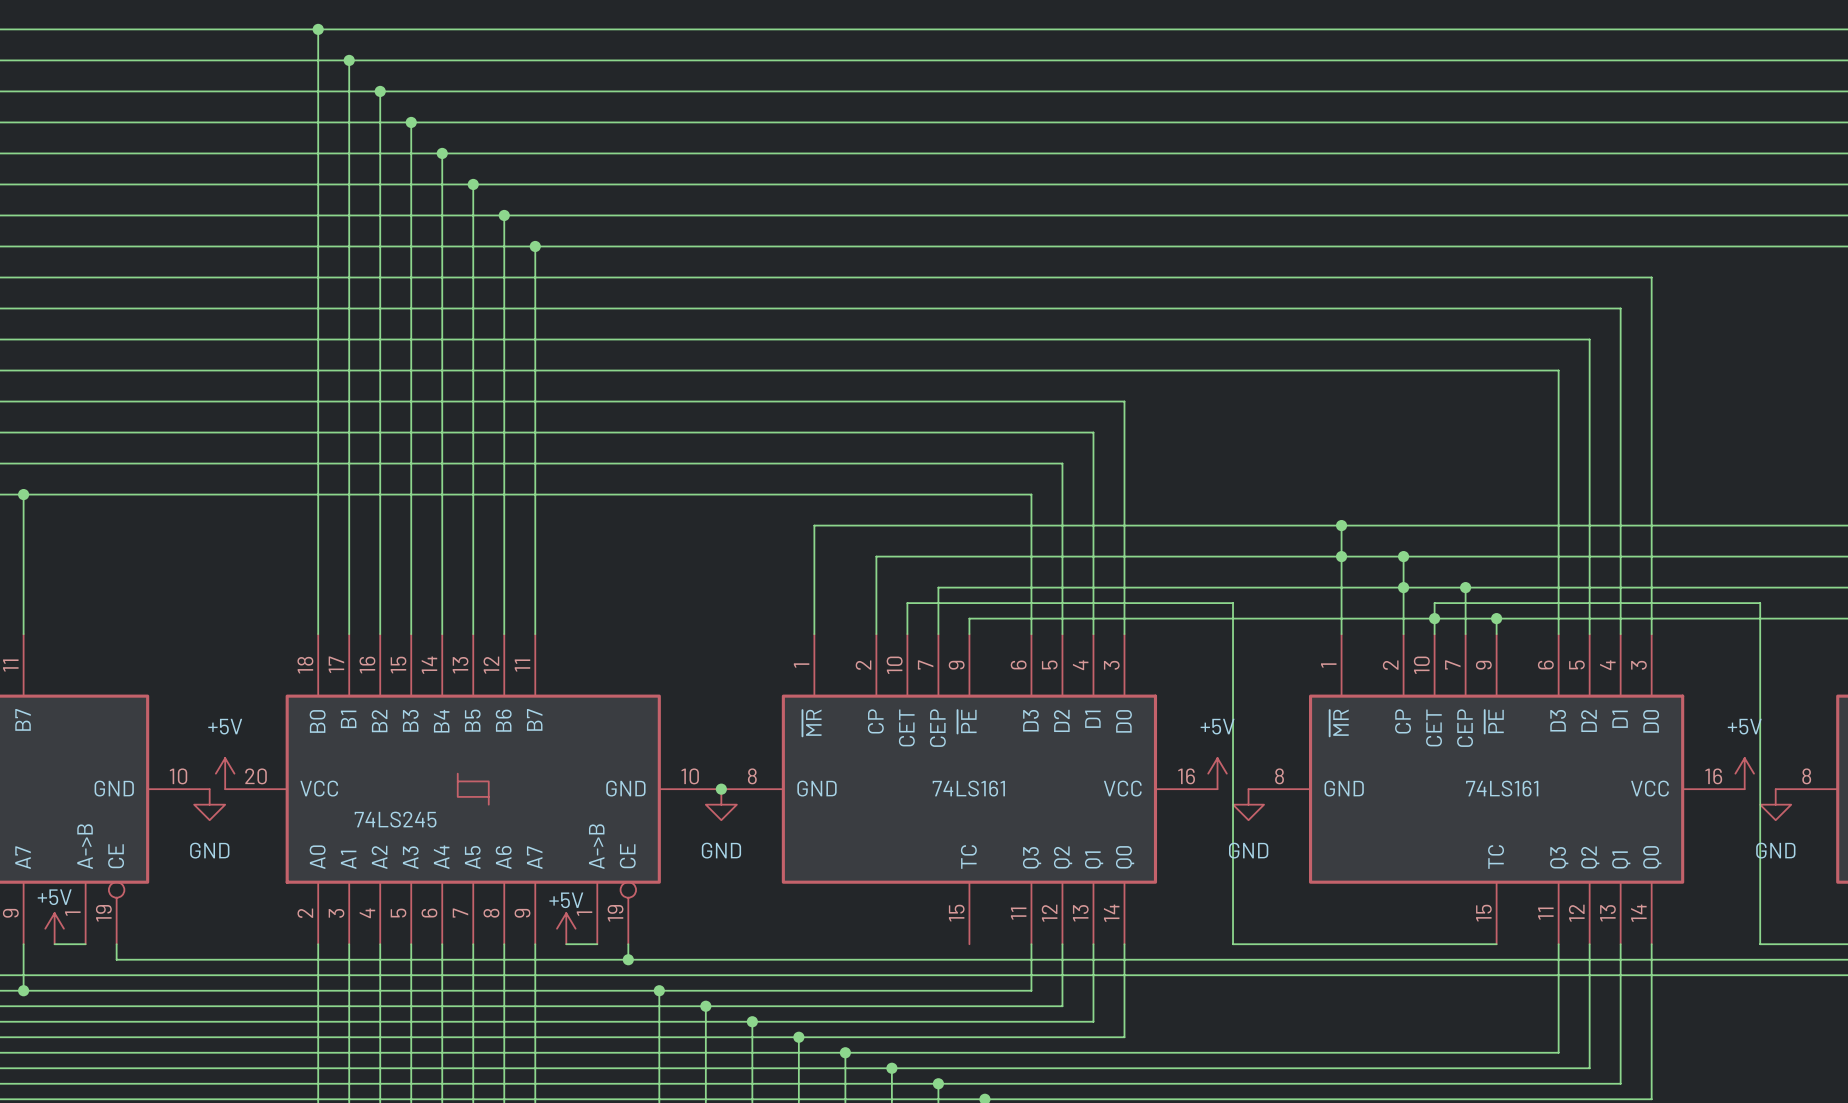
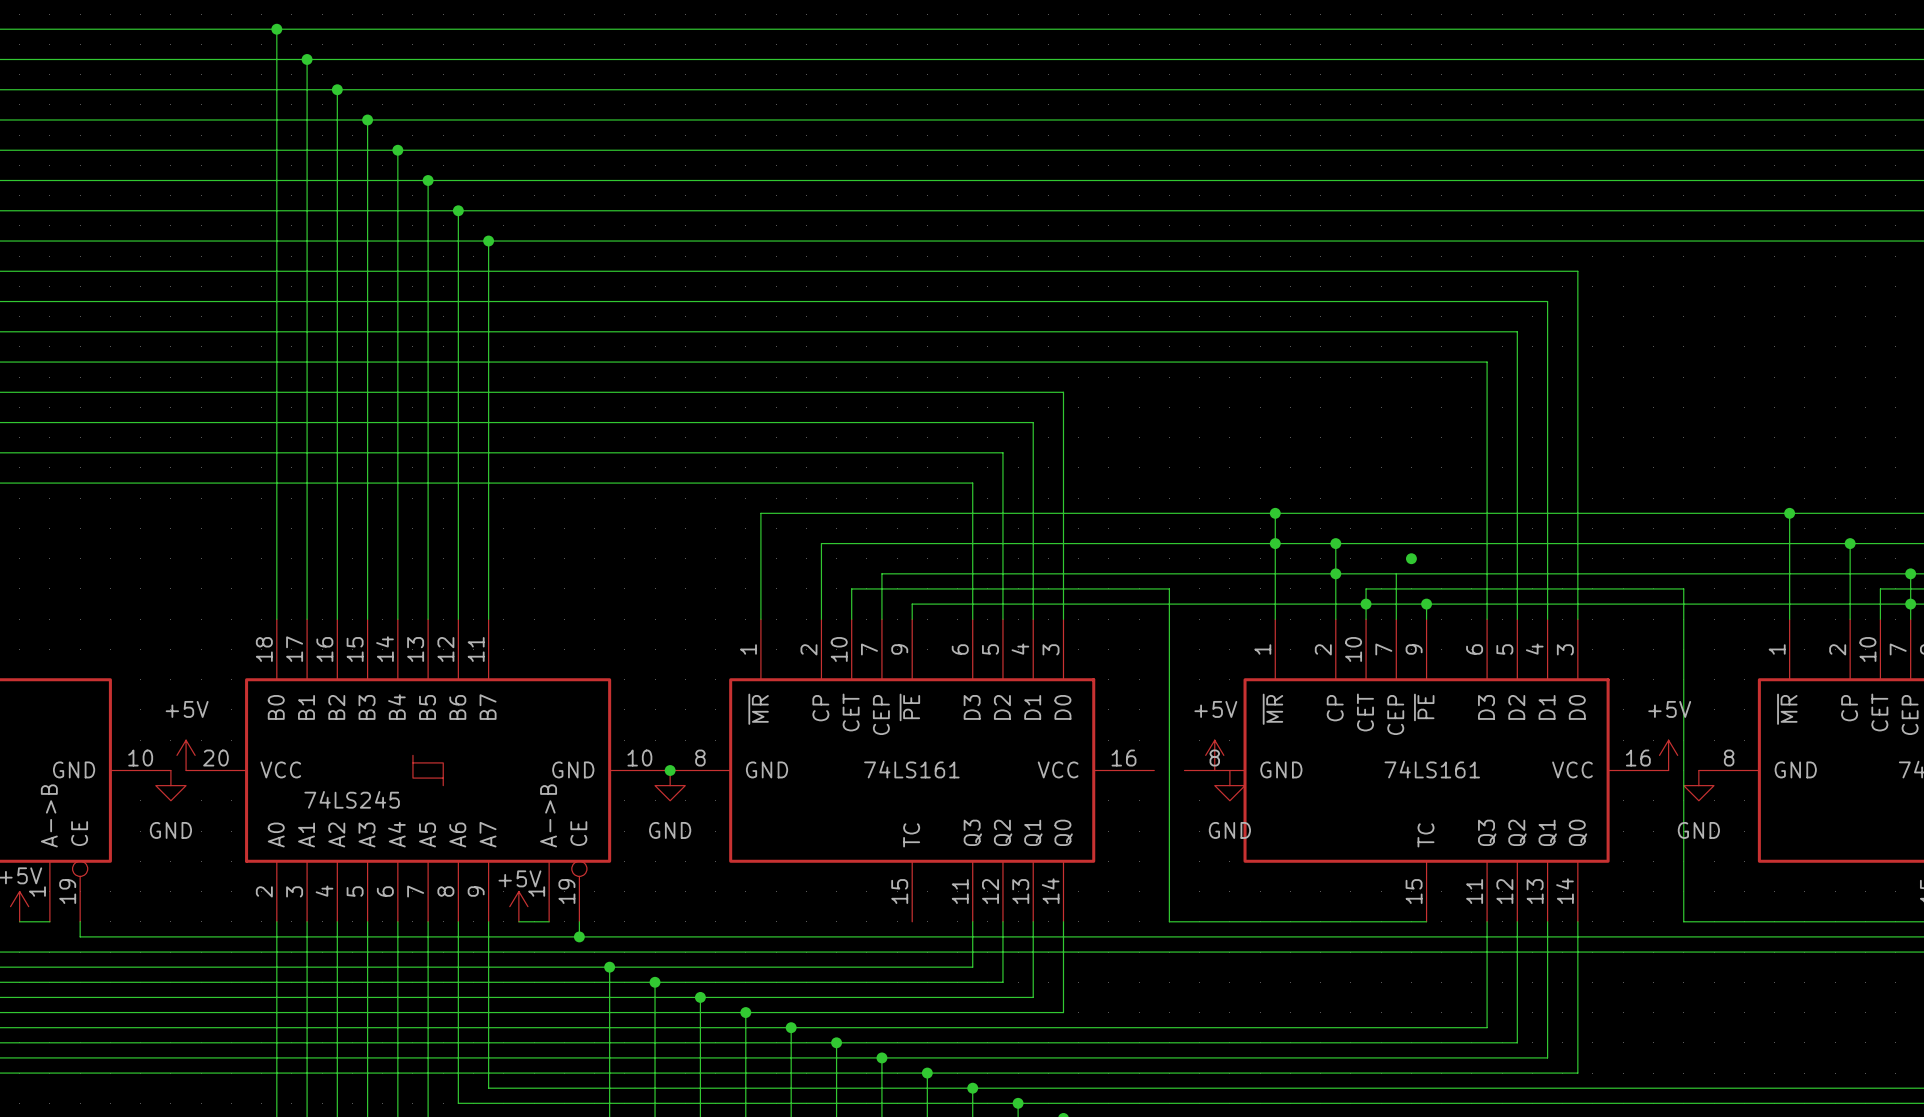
junction position: (1465, 587) -> (1411, 558)
power symbol position: +5V (1217, 773) -> +5V (1214, 755)
power symbol position: GND (1248, 804) -> GND (1229, 785)

